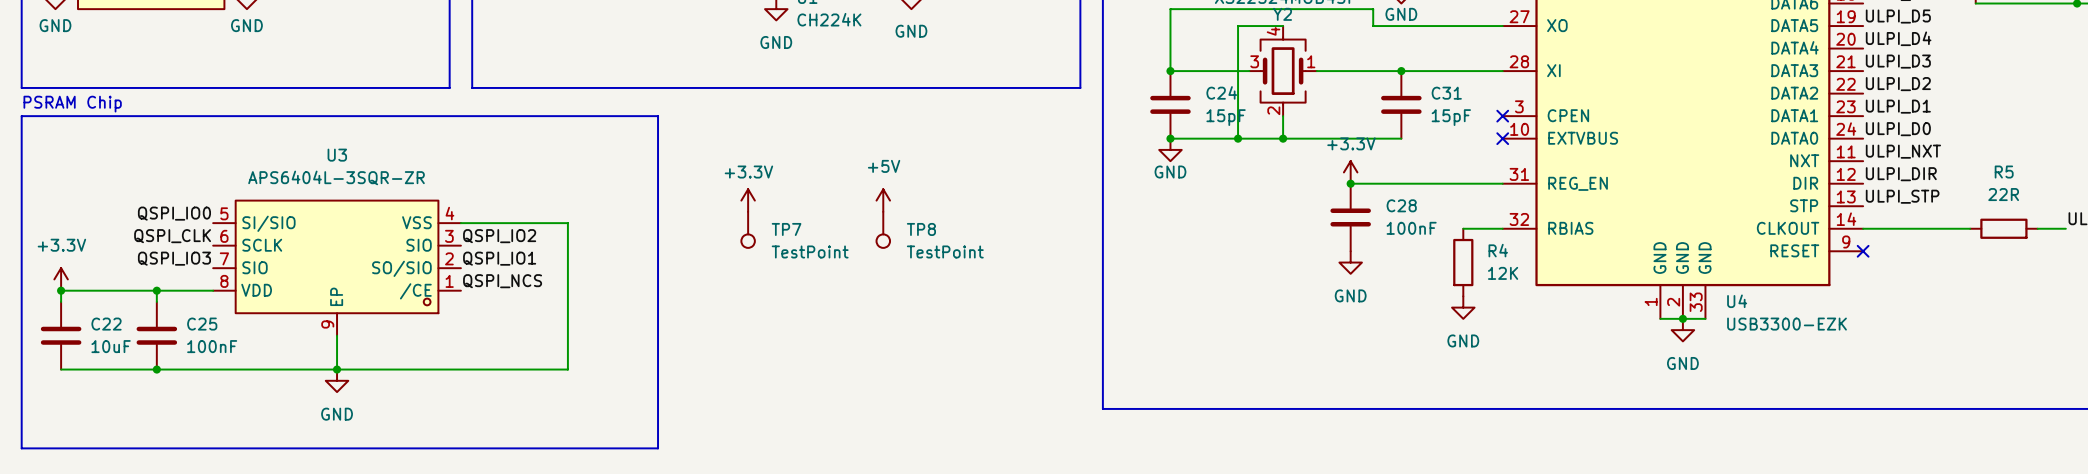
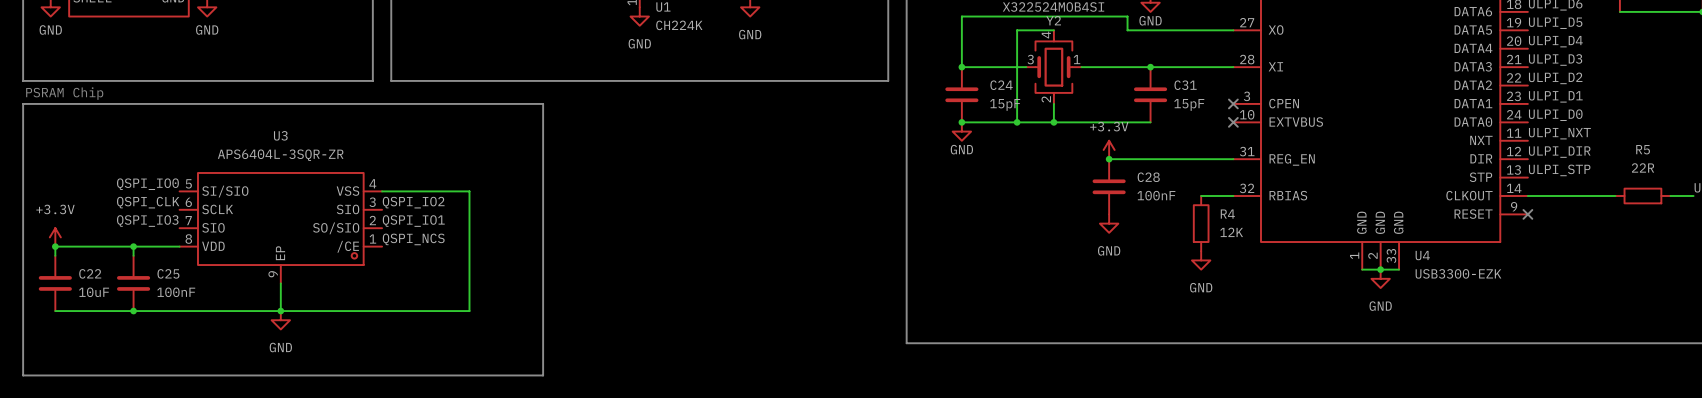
power symbol: +3.3V (748, 200) -> none
power symbol: +5V (883, 200) -> none
TP7: TestPoint (748, 229) -> none
TP8: TestPoint (883, 229) -> none

